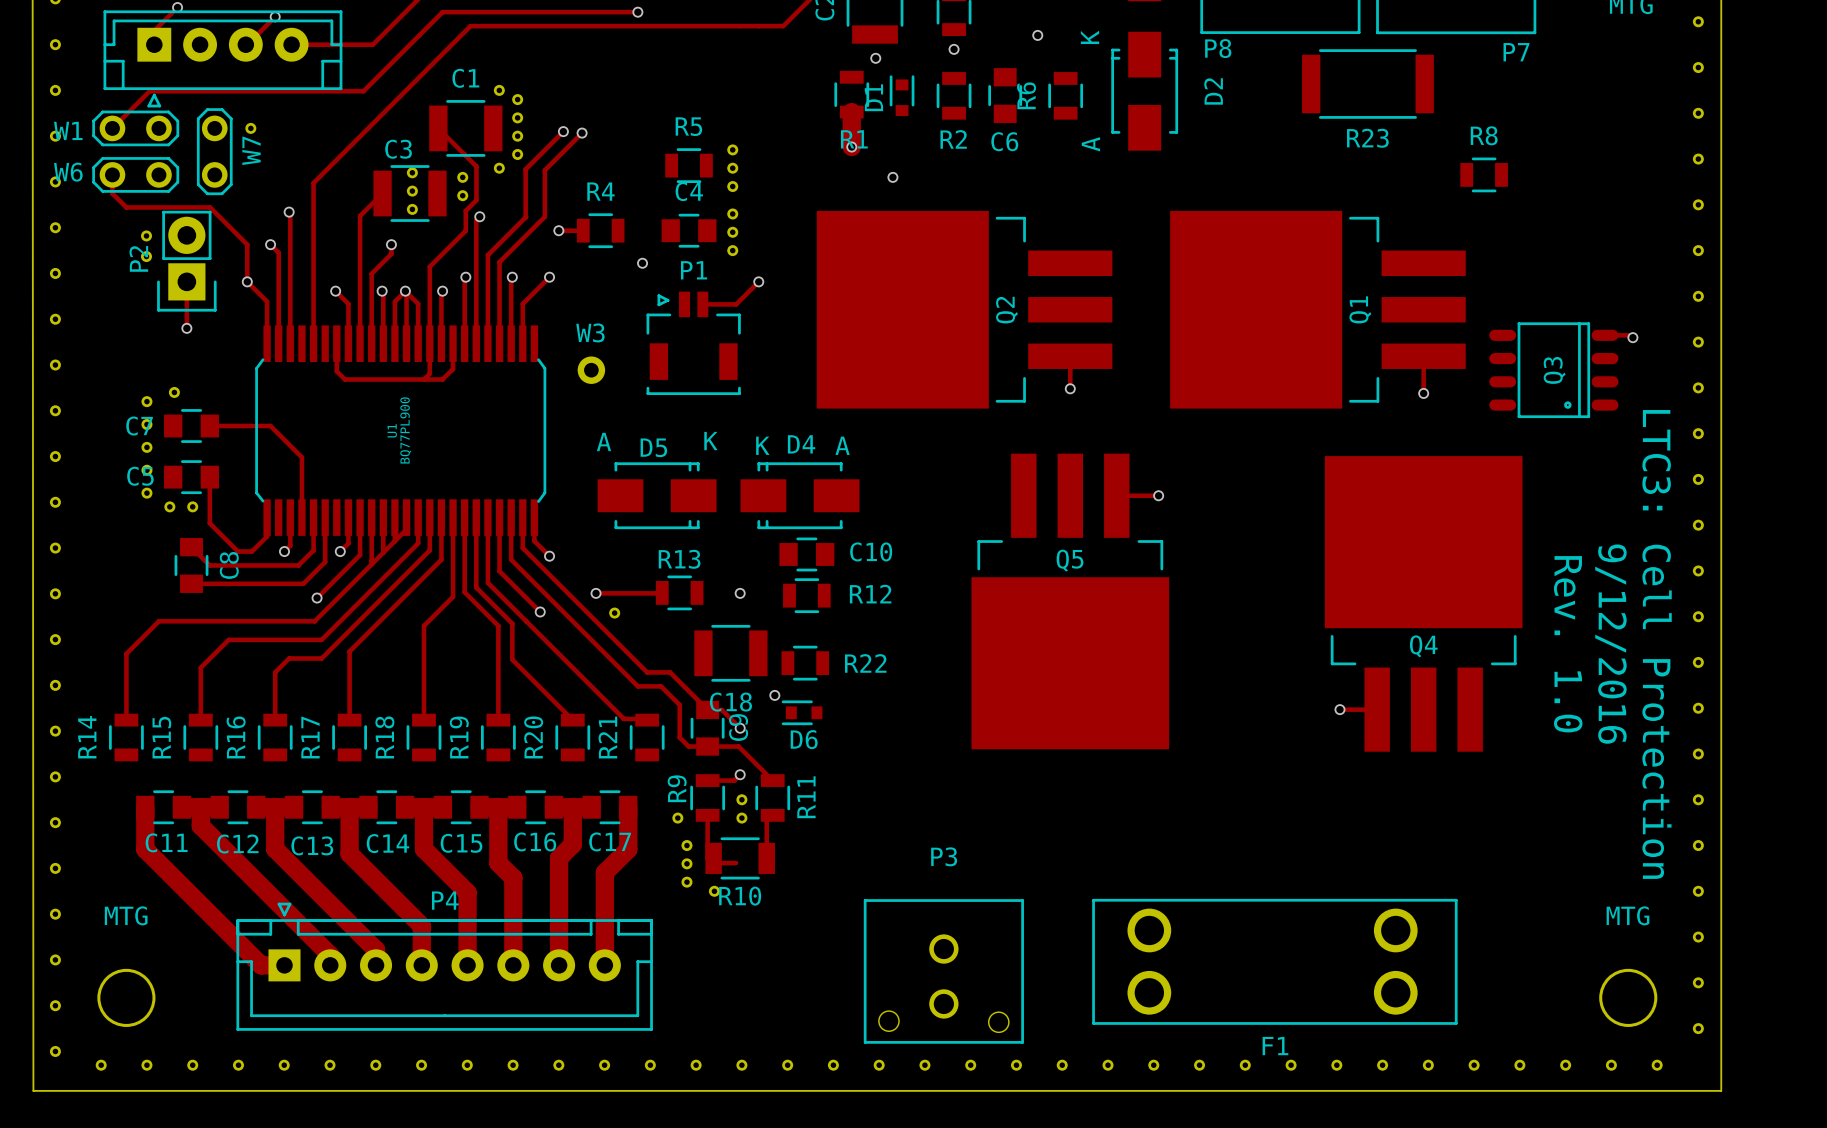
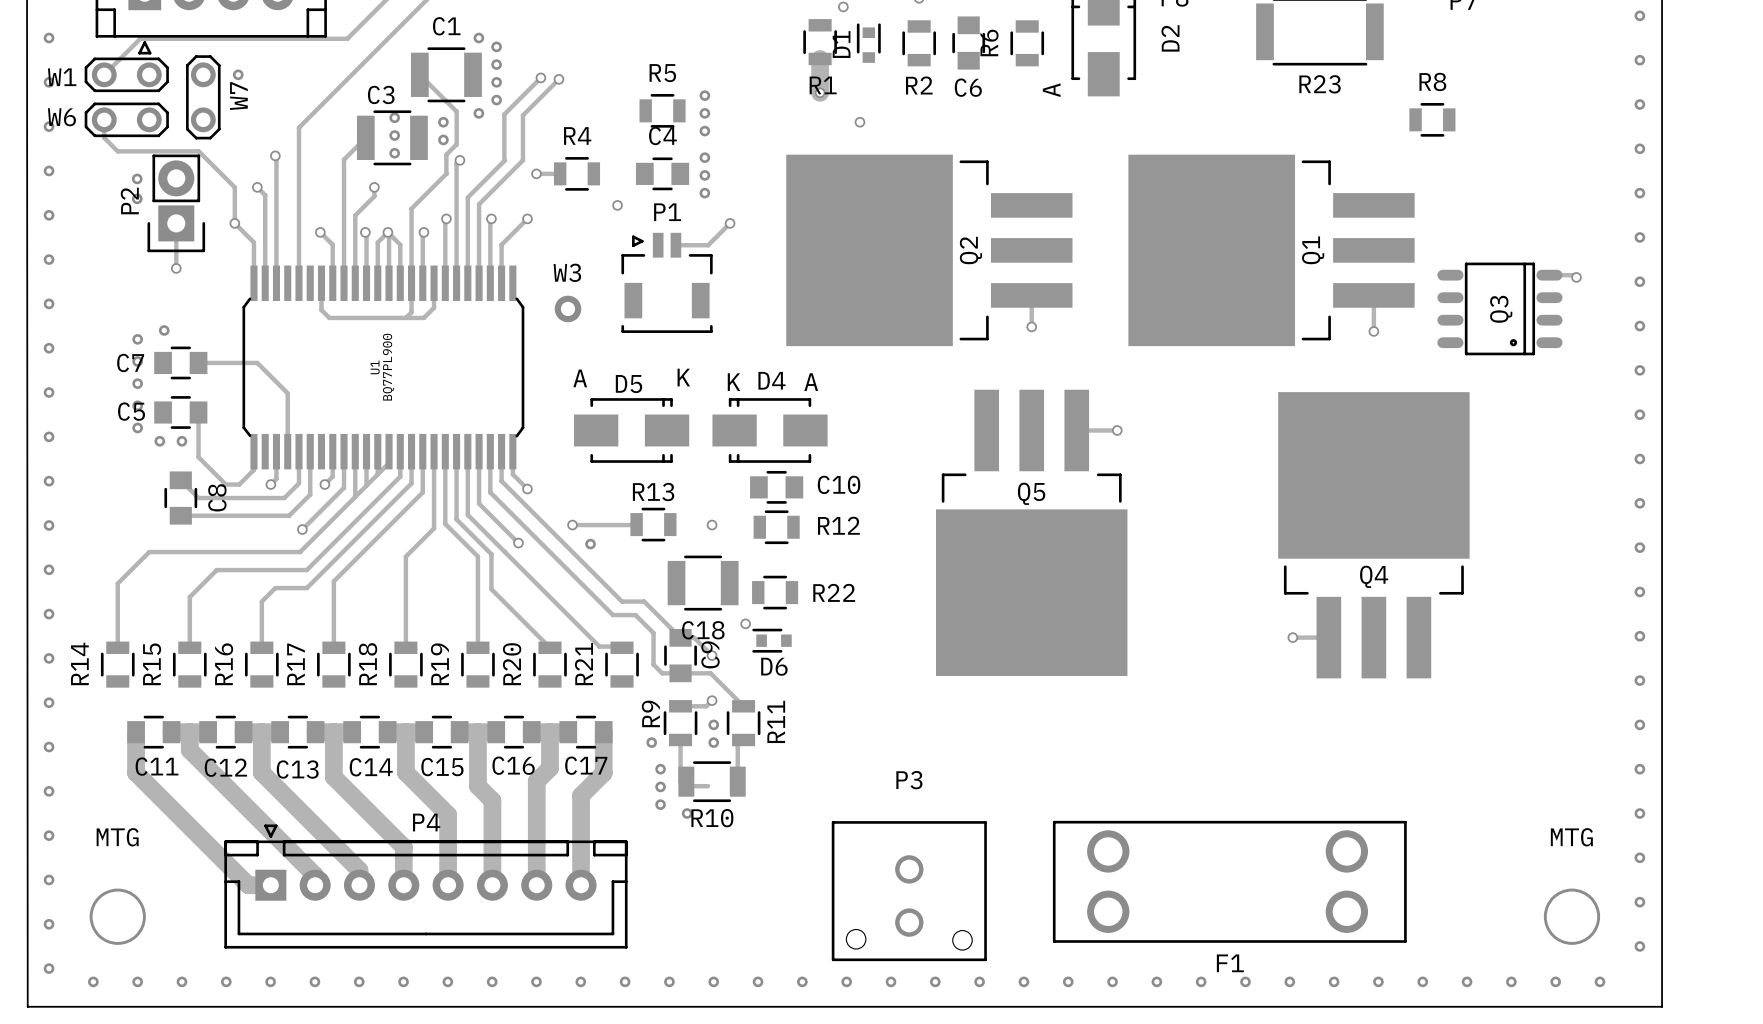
text: Rev. 1.0 (1568, 644) -> none
text: 9/12/2016 (1610, 644) -> none
text: LTC3: Cell Protection (1657, 644) -> none

